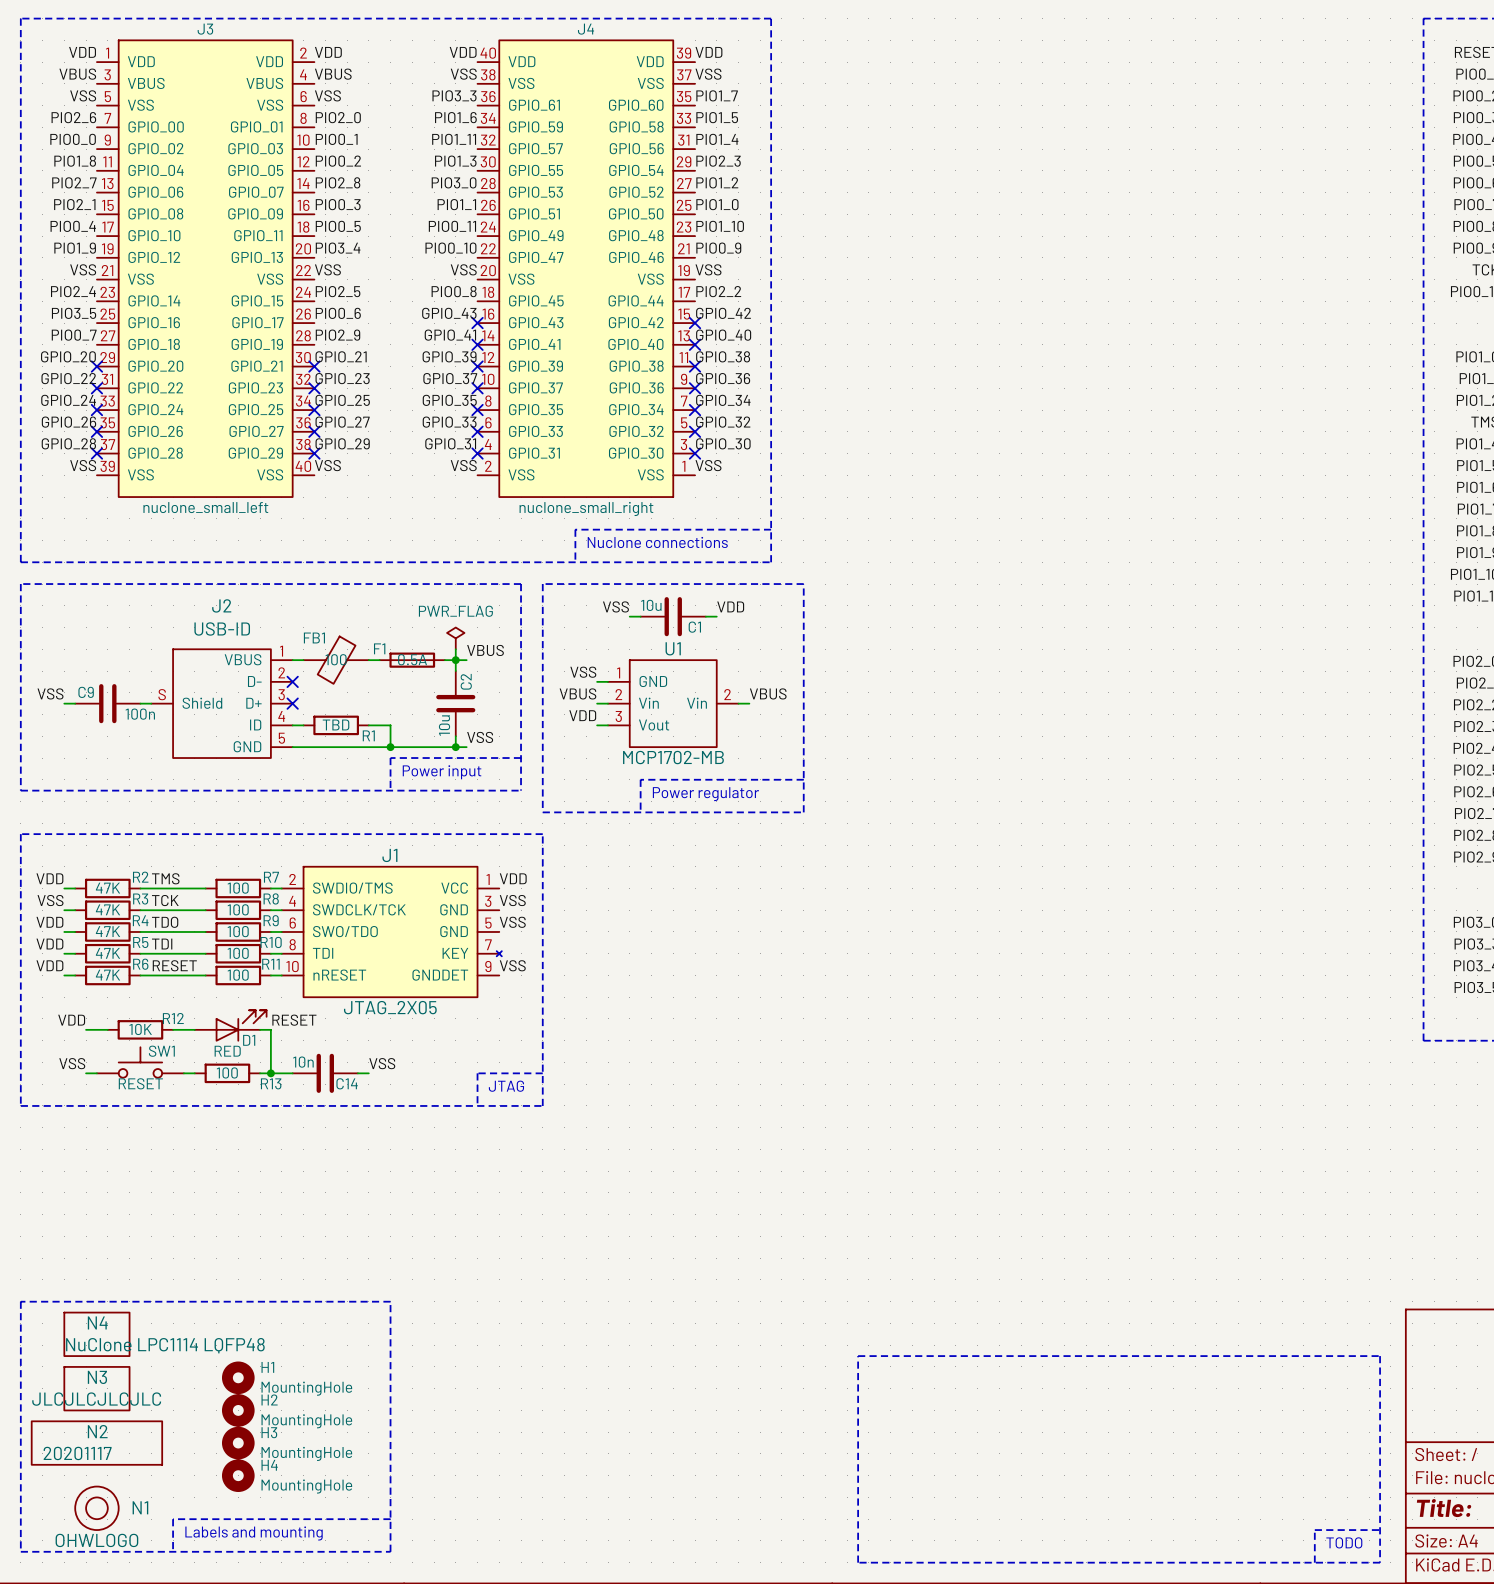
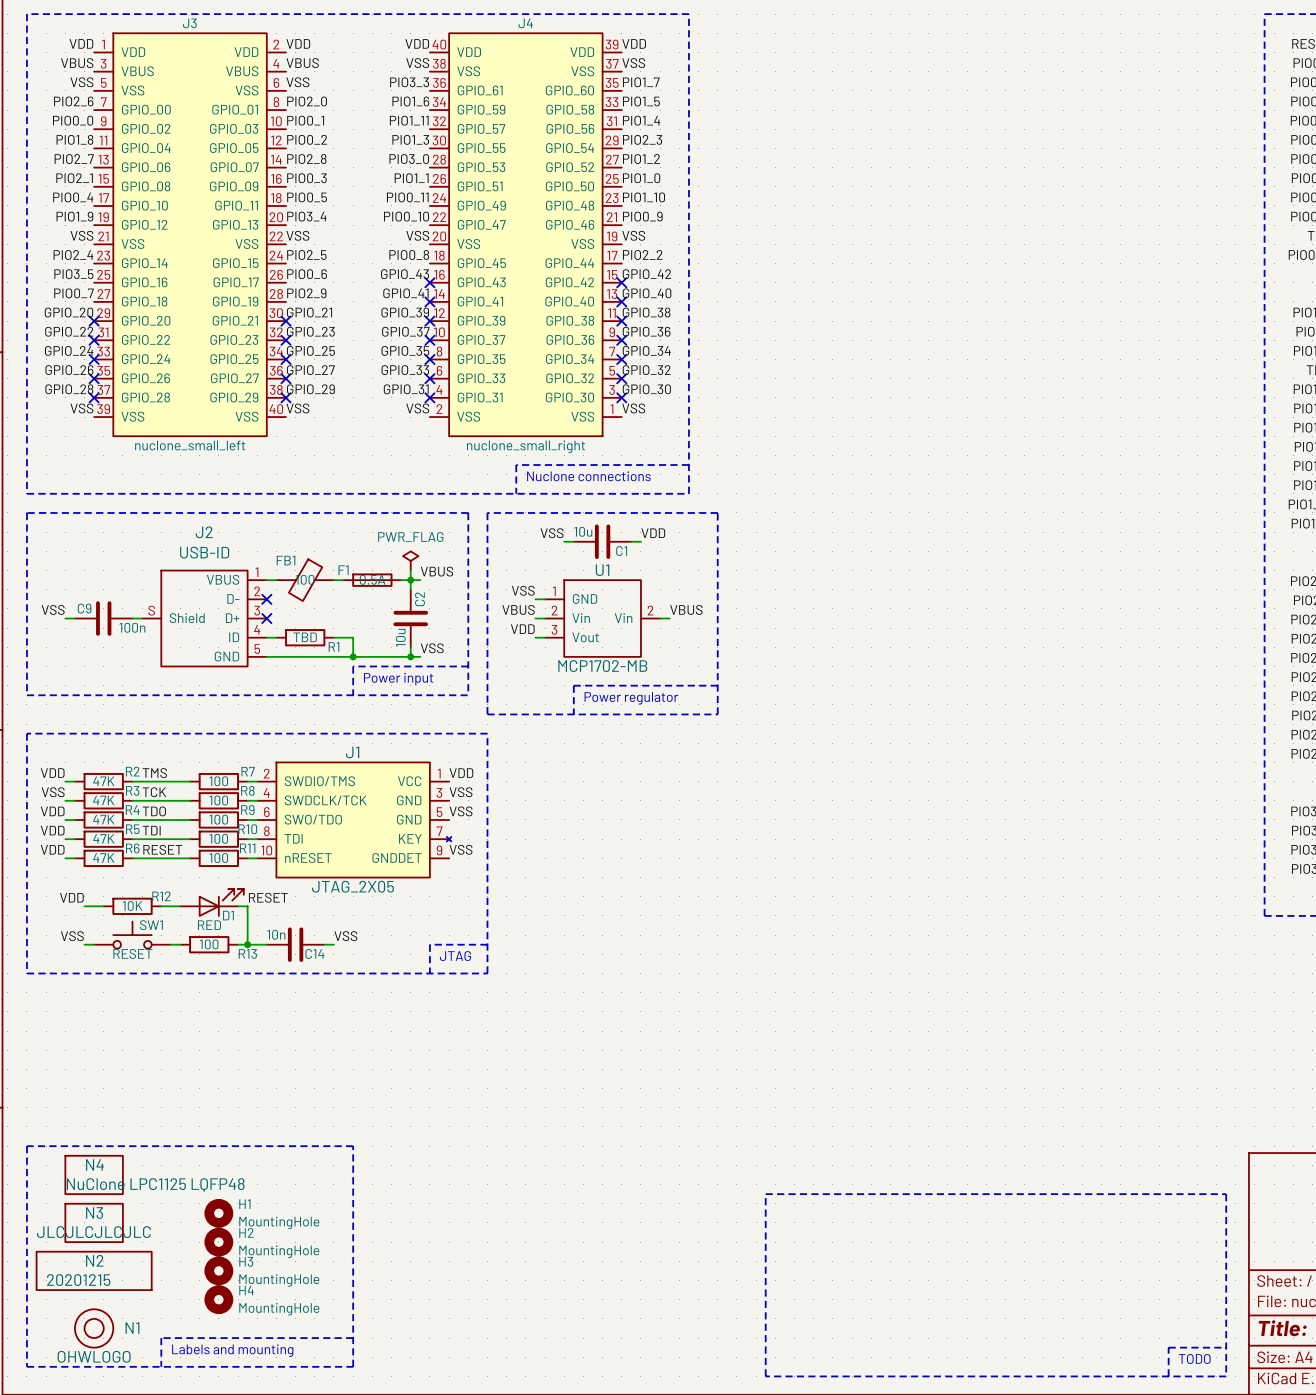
N4 value: NuClone LPC1114 LQFP48 (165, 1345) -> NuClone LPC1125 LQFP48 (155, 1184)
N2 value: 20201117 (77, 1453) -> 20201215 (78, 1280)

